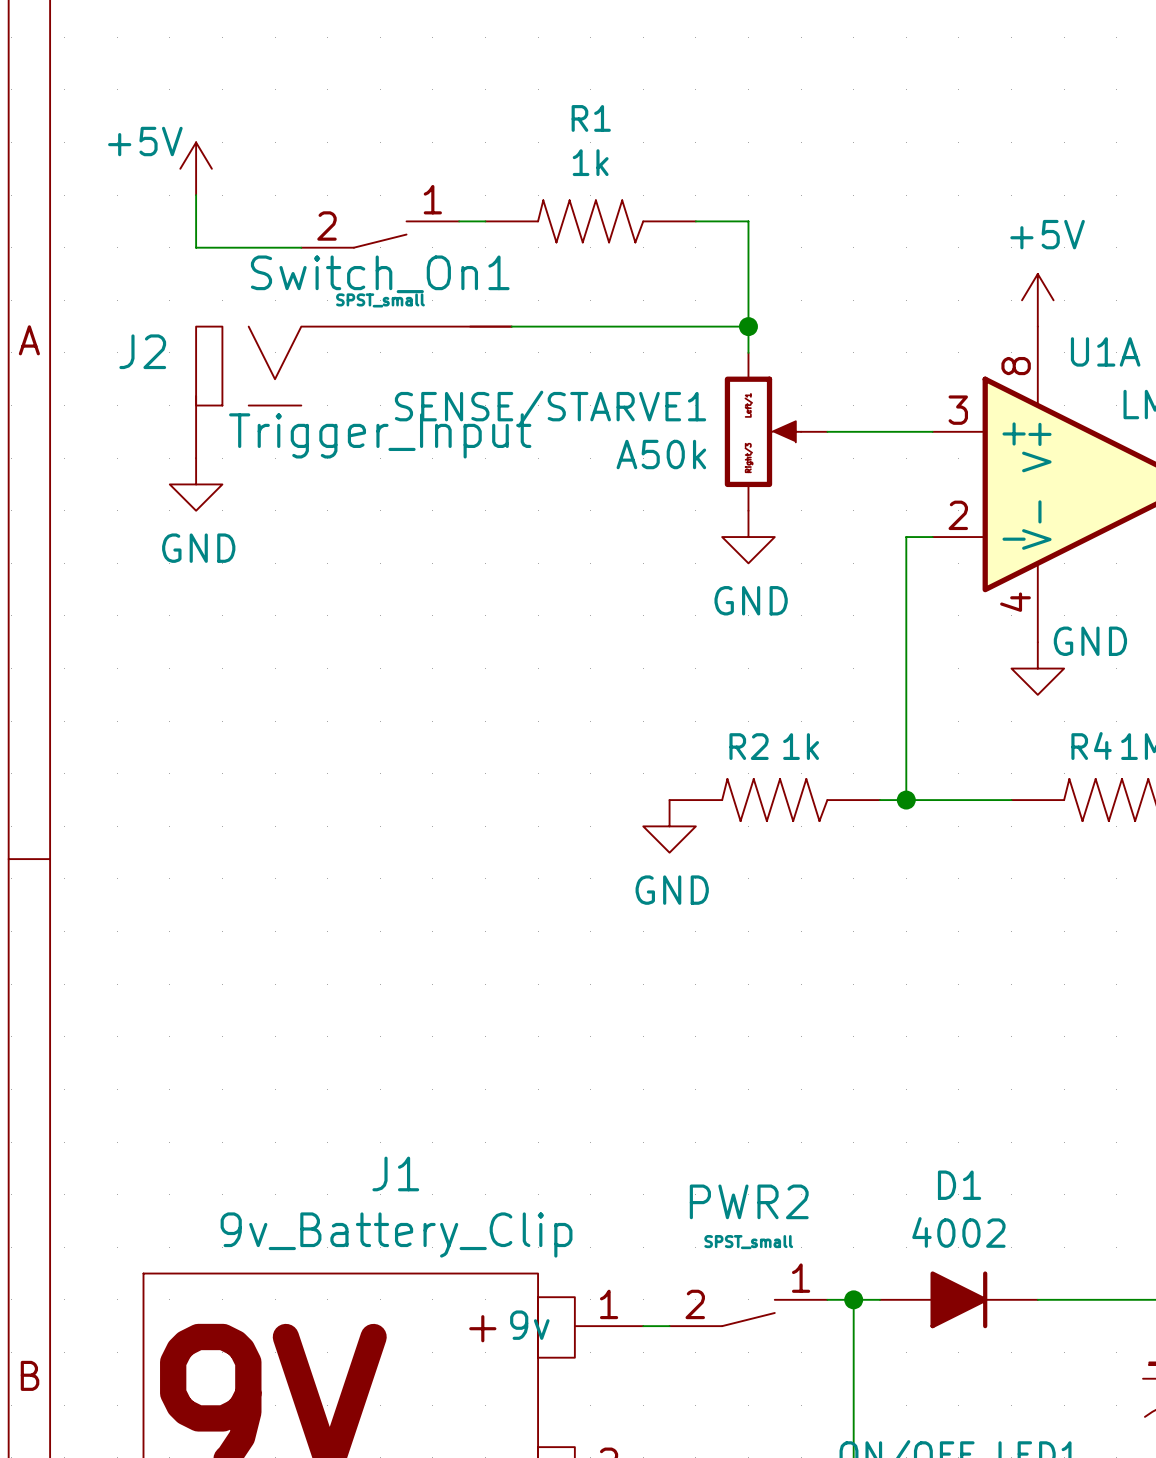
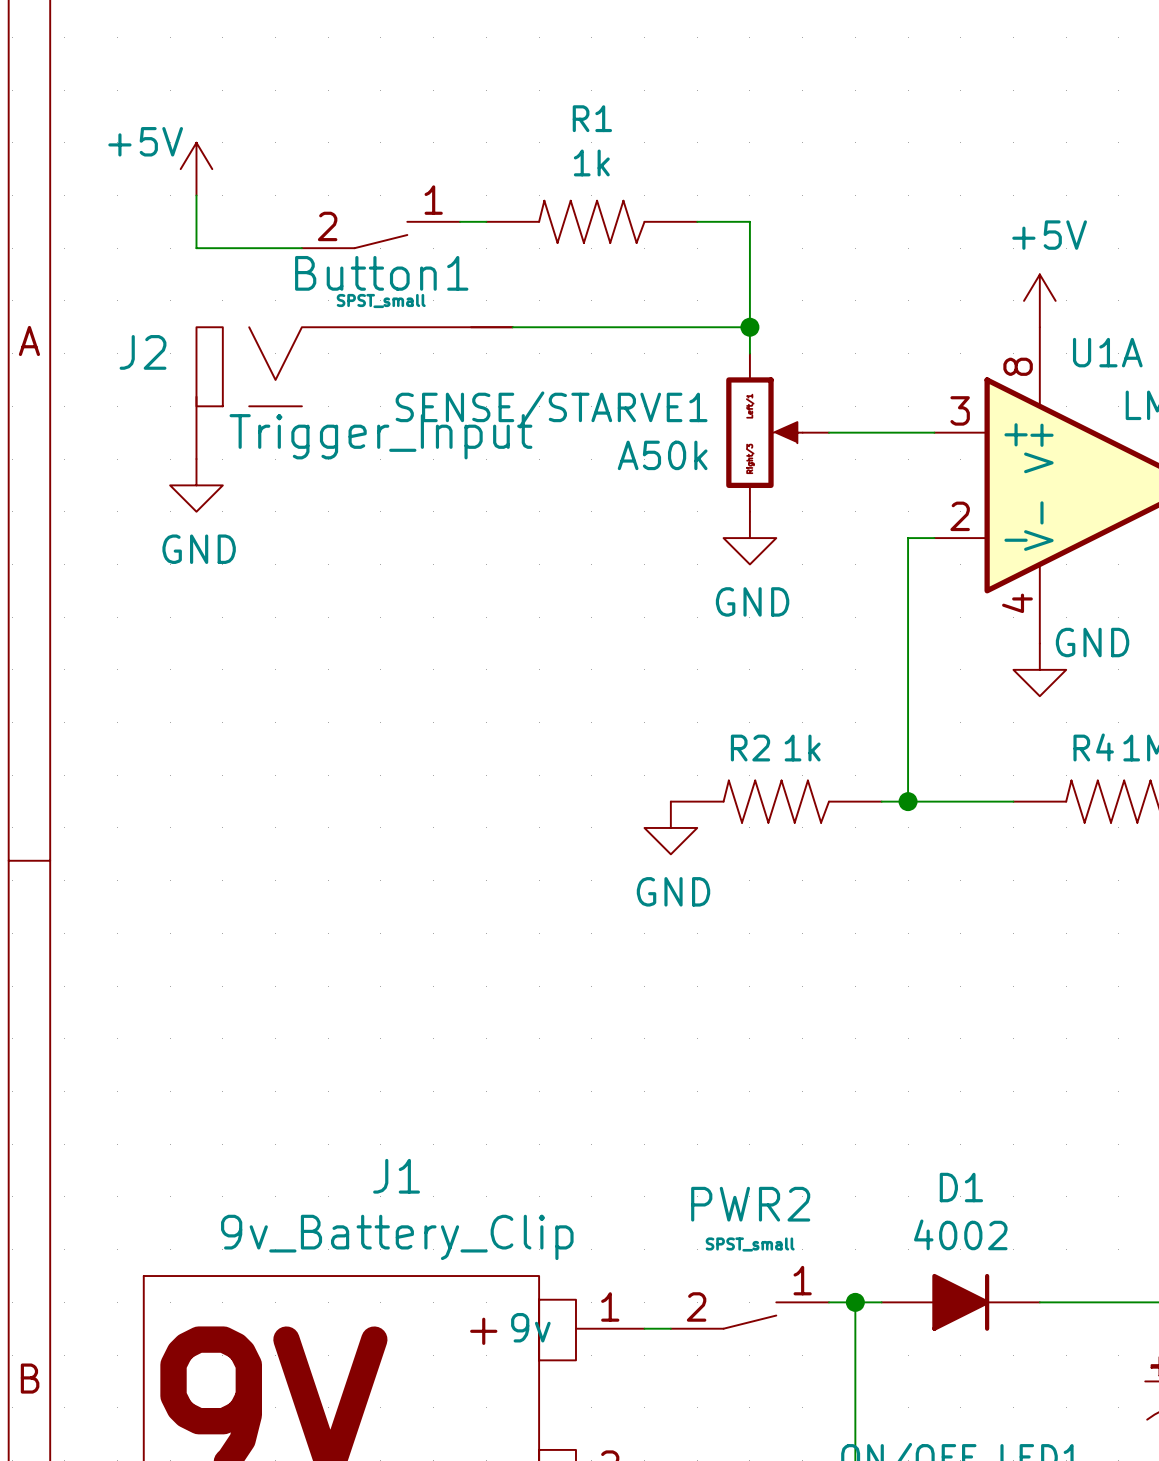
Switch_On1 name: Switch_On1 (380, 274) -> Button1 (381, 273)

